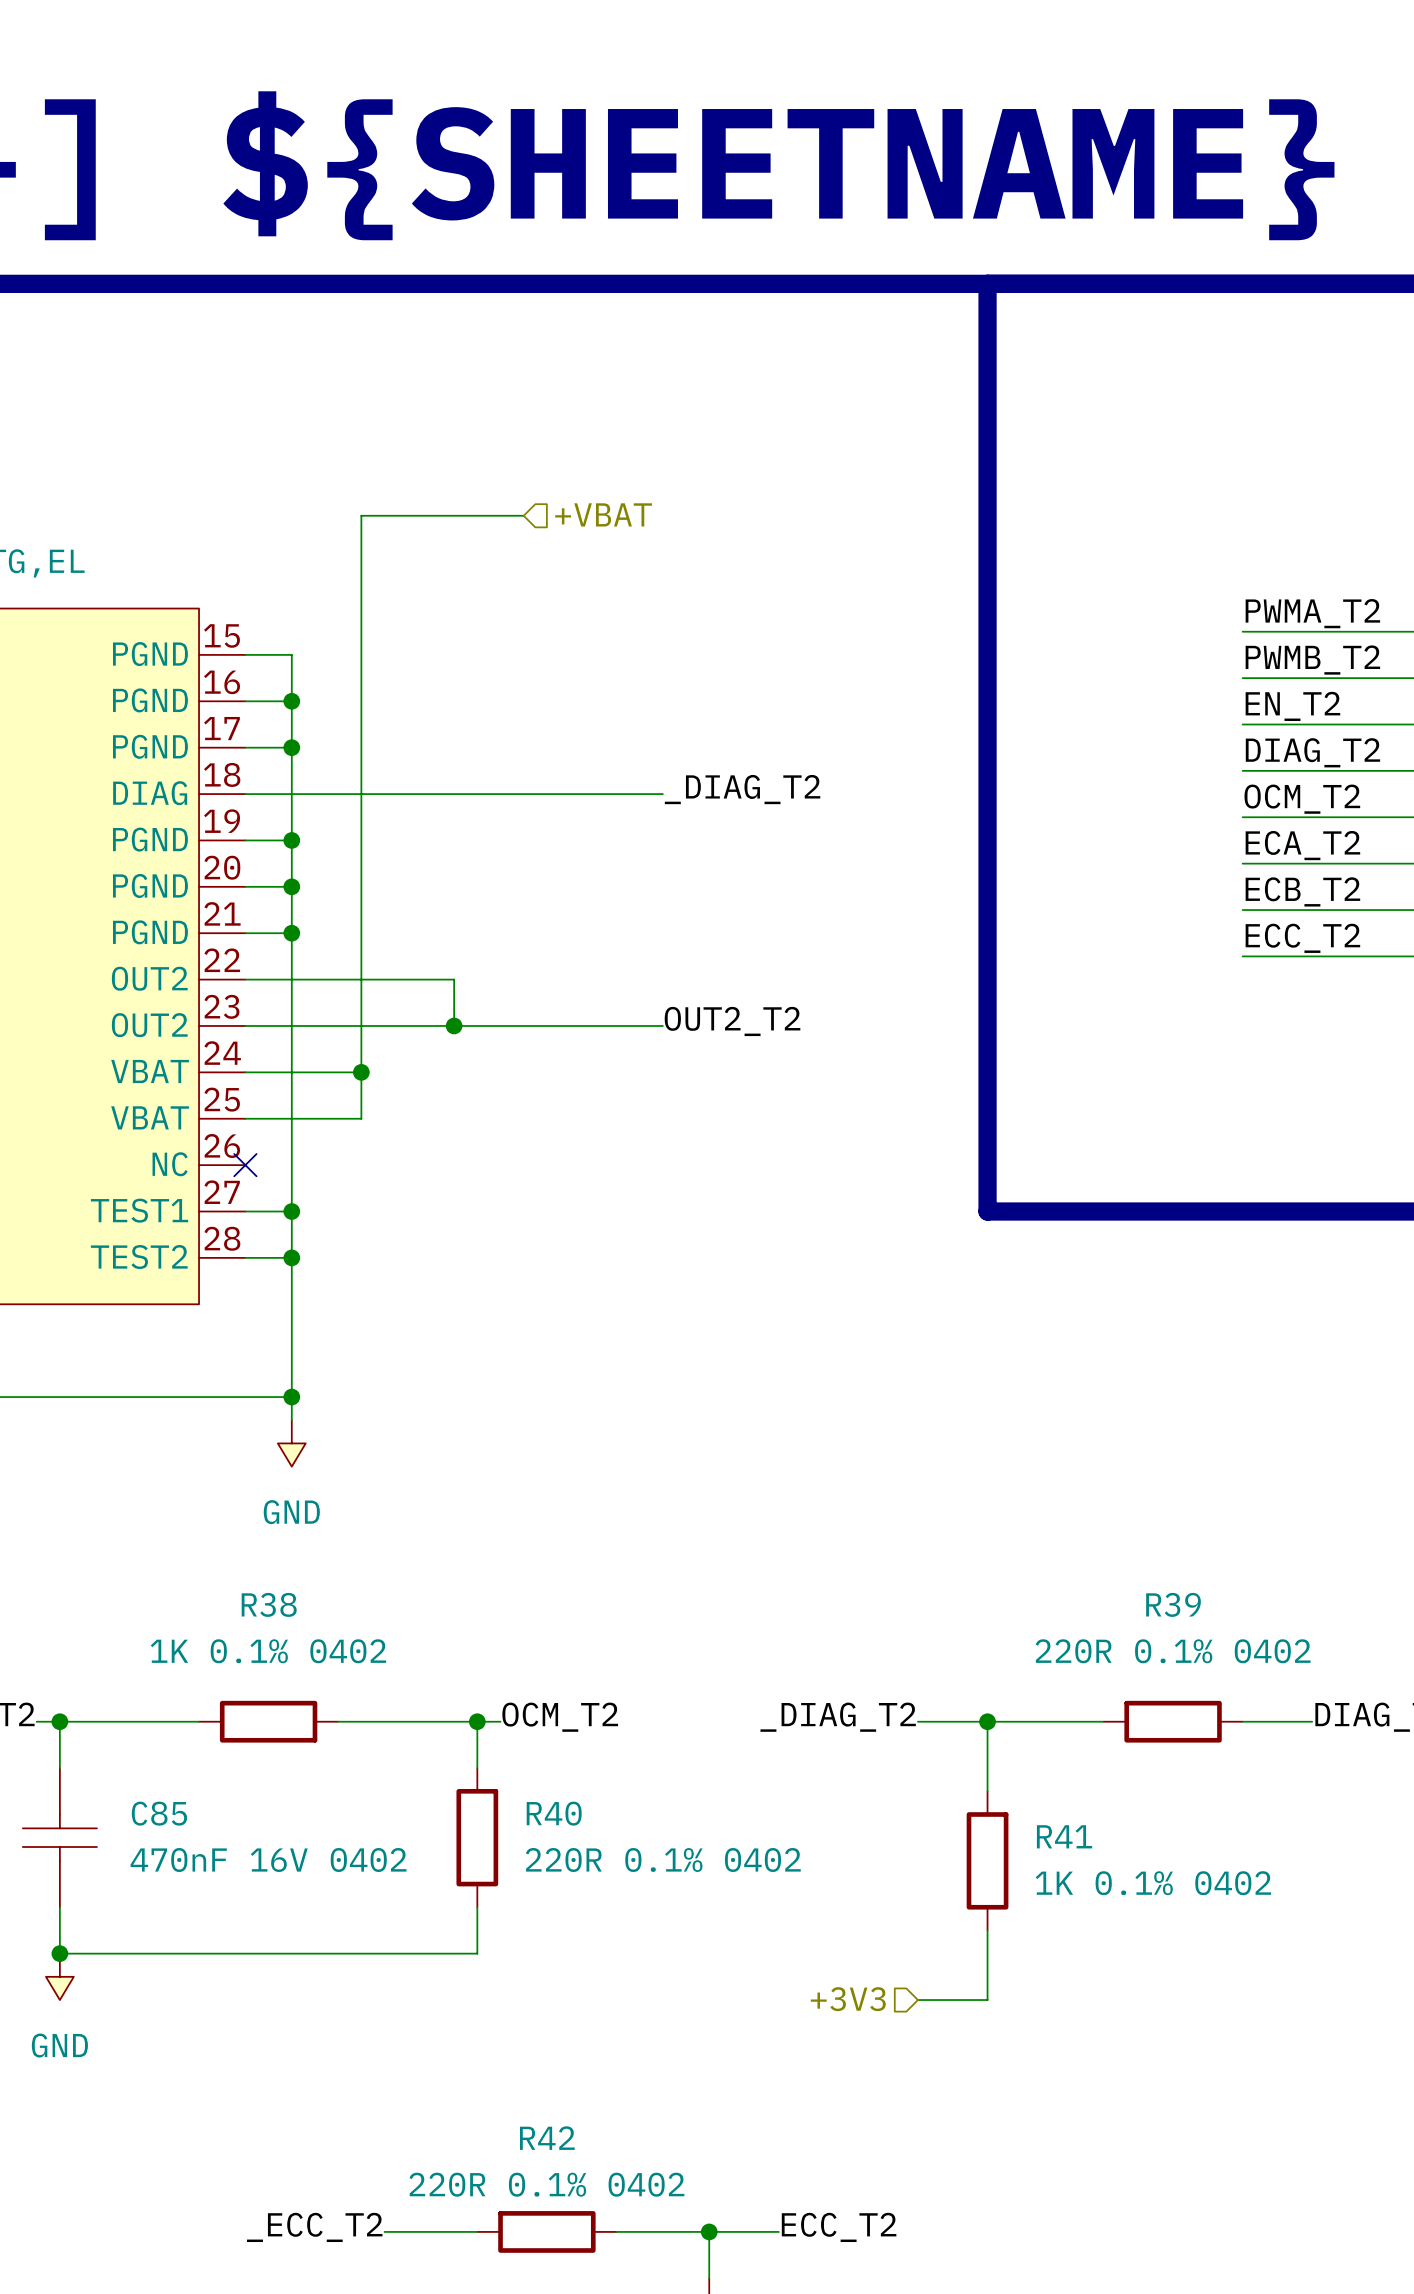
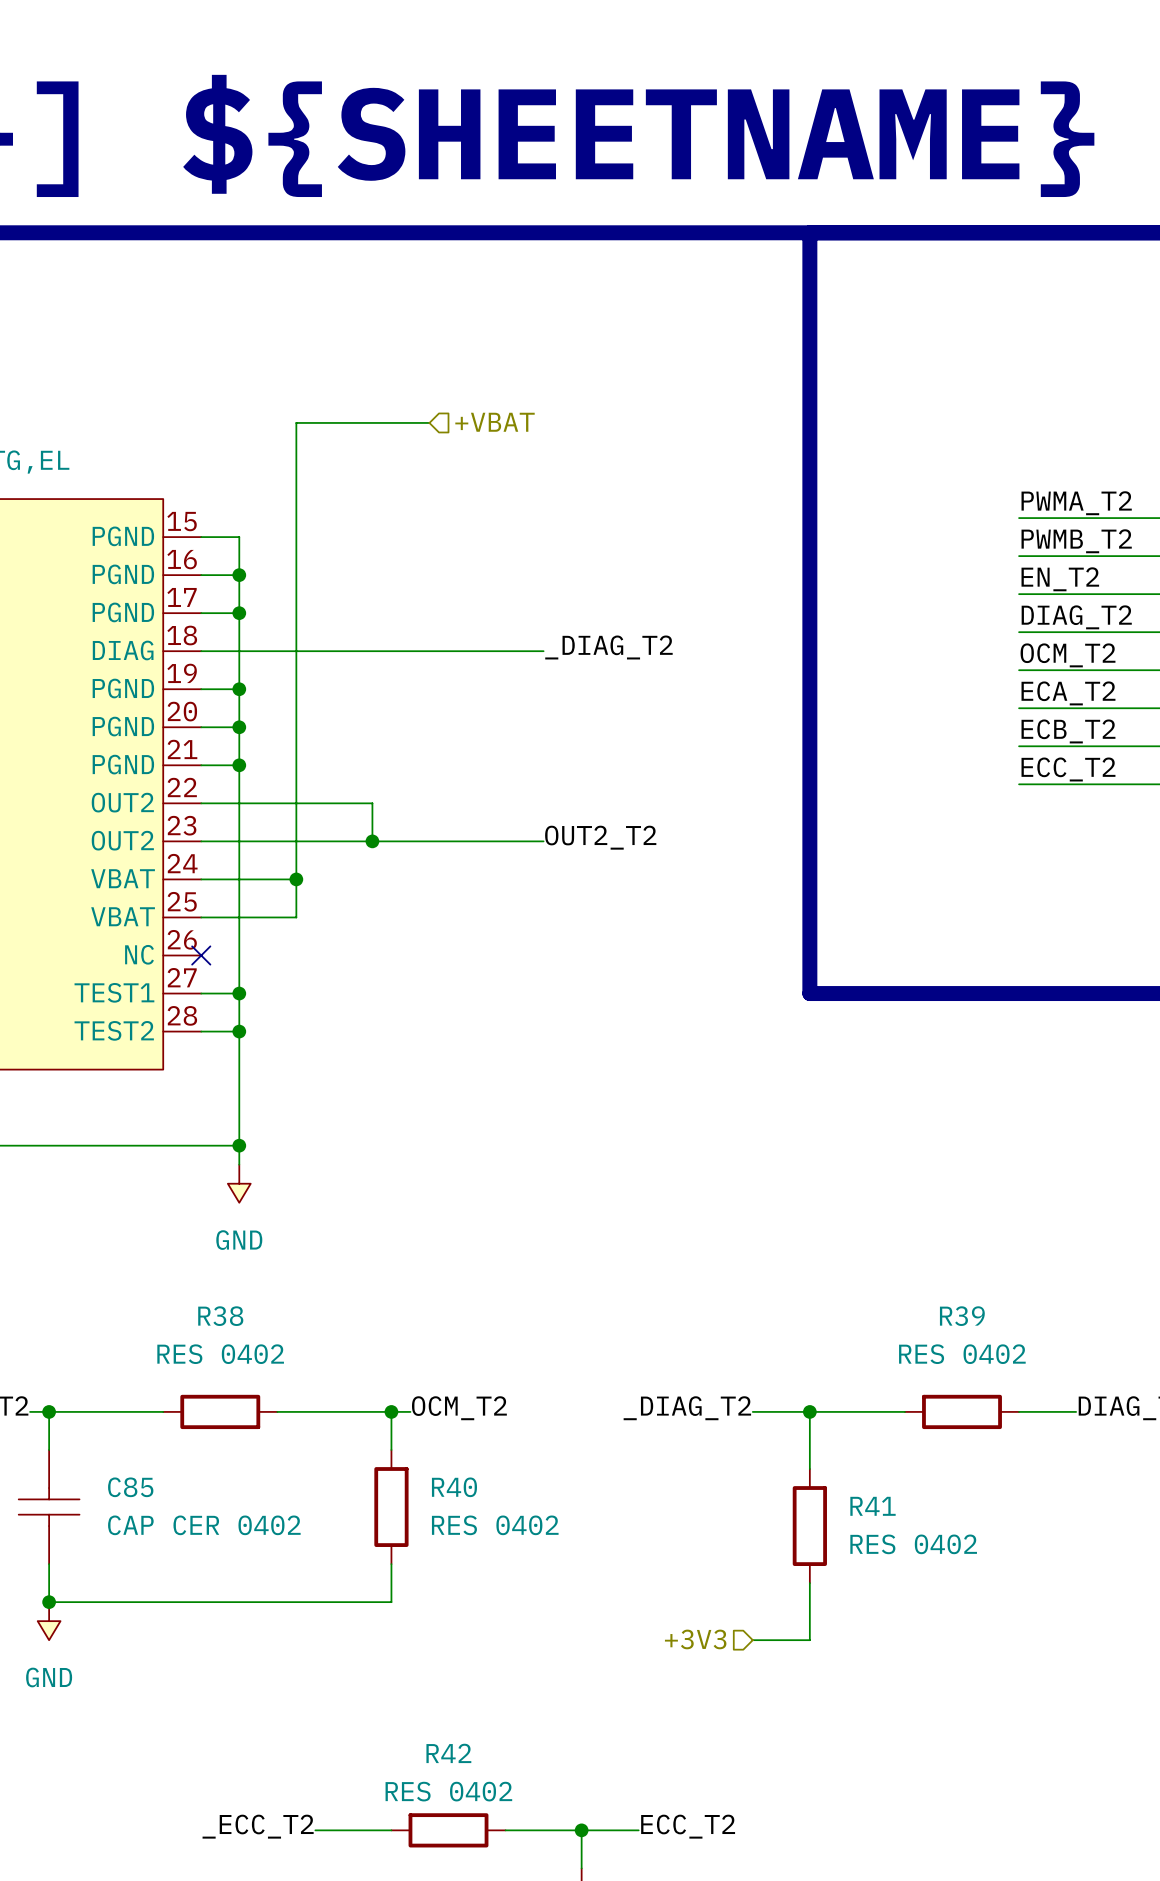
R38 value: 1K 0.1% 0402 (268, 1651) -> RES 0402 (220, 1354)
R39 value: 220R 0.1% 0402 (1173, 1651) -> RES 0402 (962, 1354)
C85 value: 470nF 16V 0402 (268, 1860) -> CAP CER 0402 (204, 1525)
R40 value: 220R 0.1% 0402 (663, 1860) -> RES 0402 (495, 1525)
R41 value: 1K 0.1% 0402 (1153, 1883) -> RES 0402 (913, 1544)
R42 value: 220R 0.1% 0402 (546, 2184) -> RES 0402 (448, 1791)

